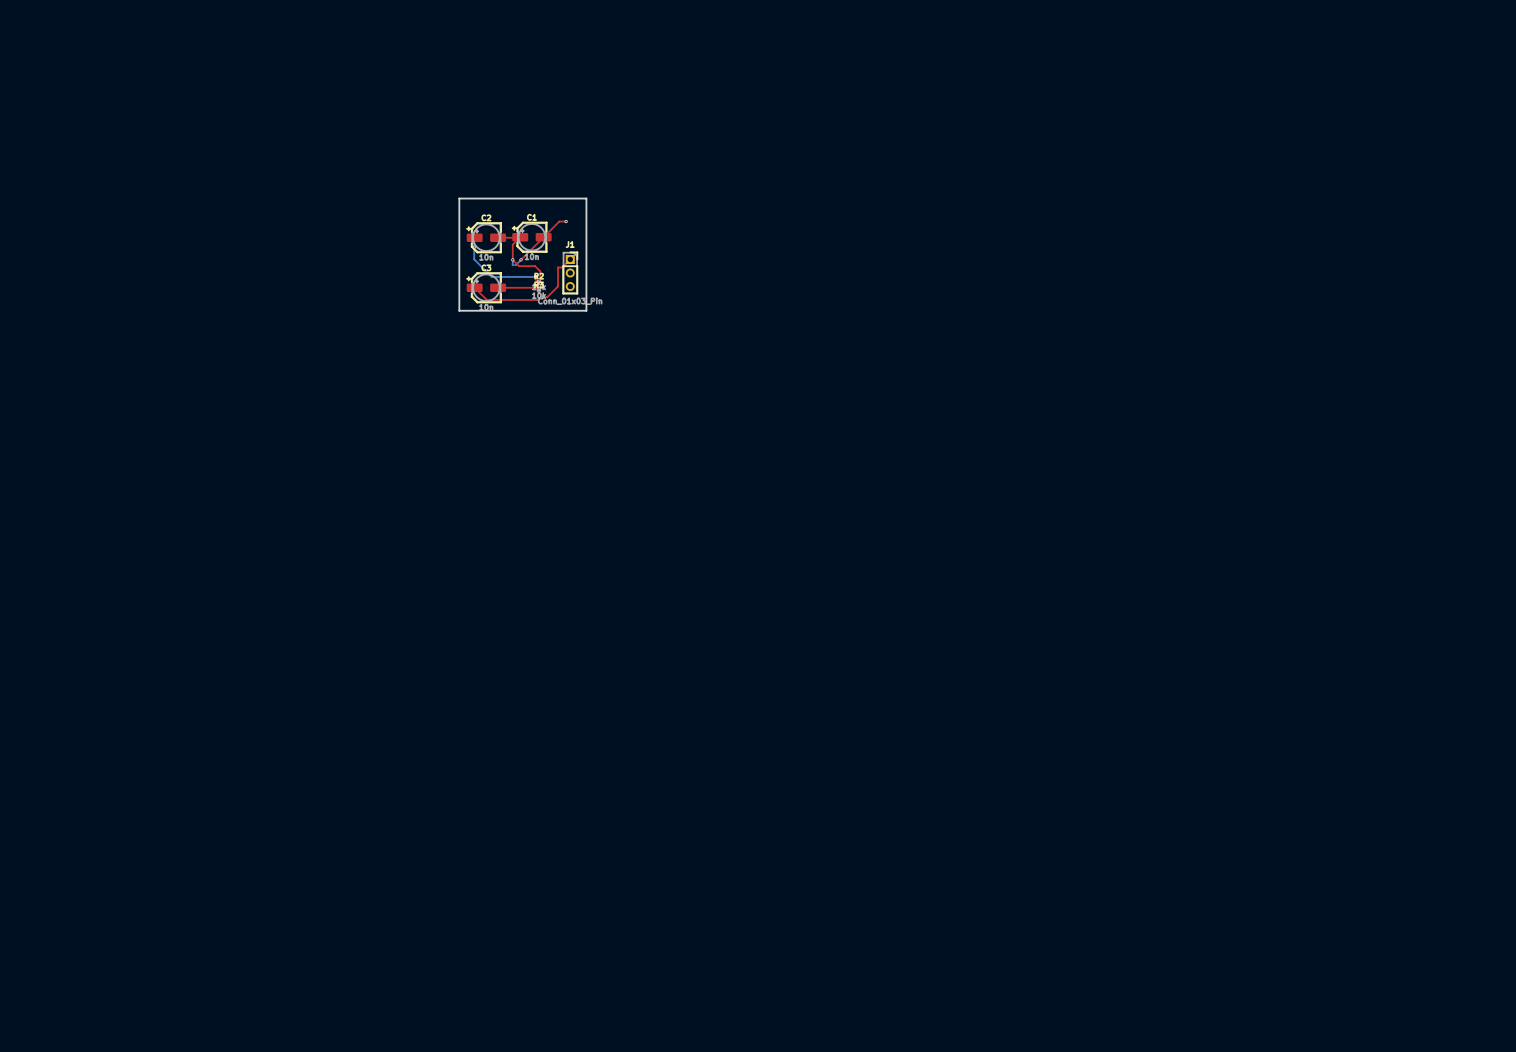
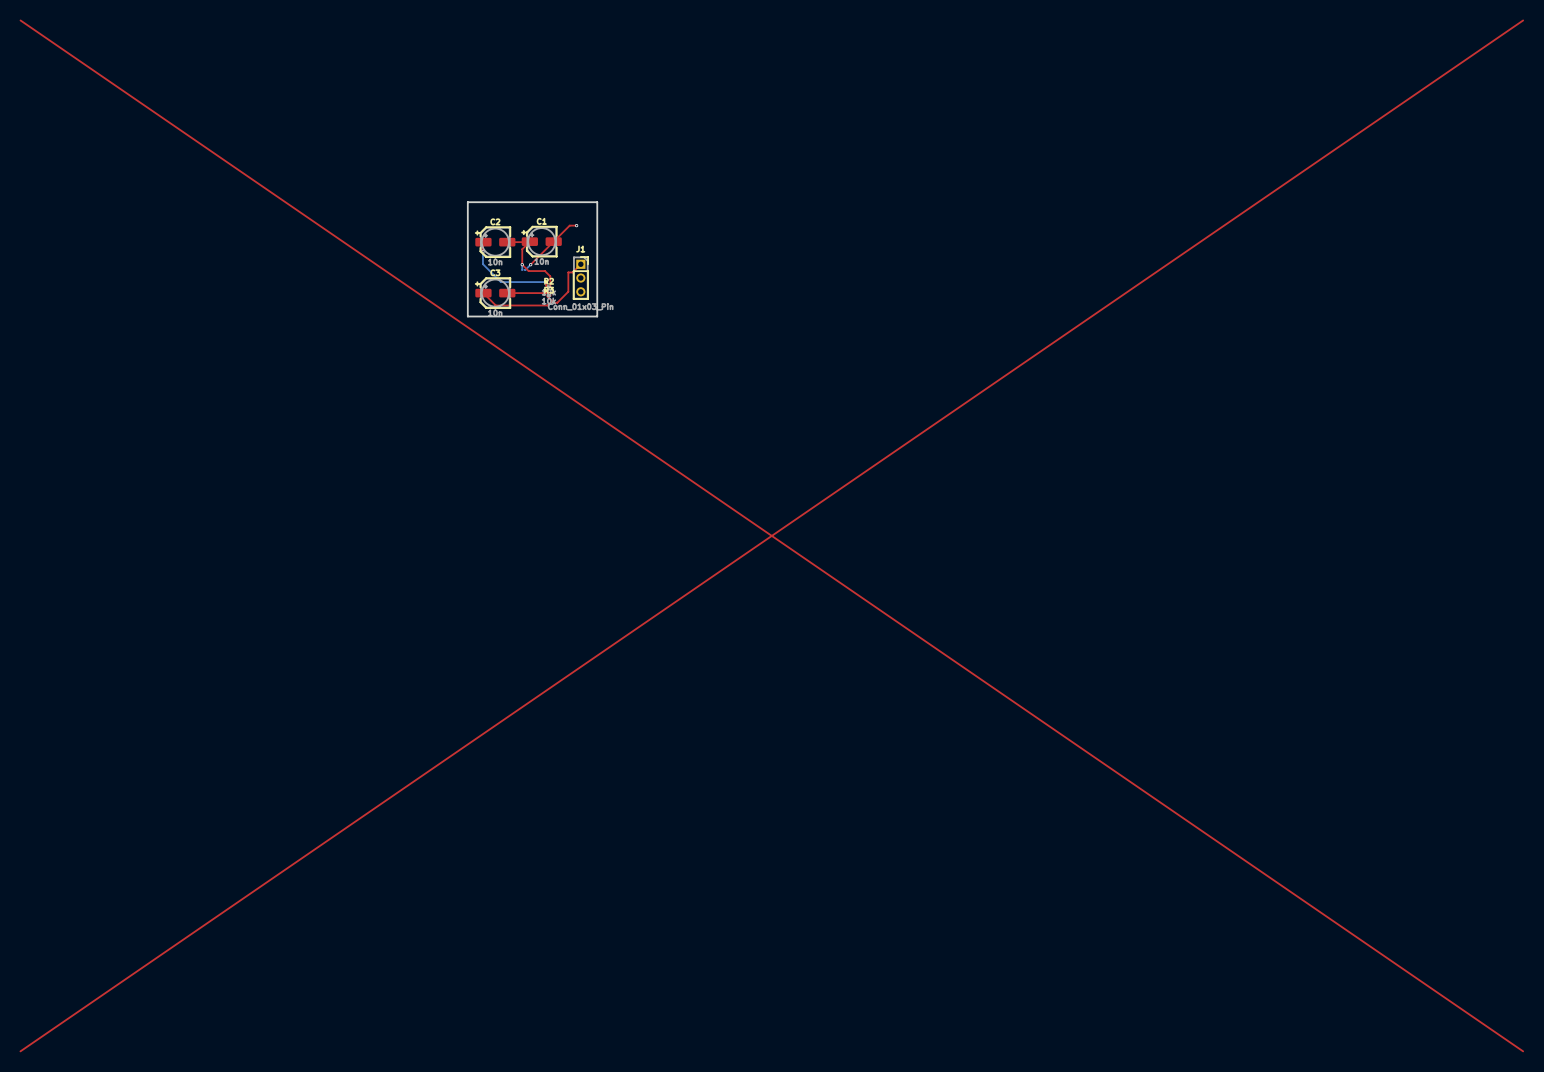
top track: none -> (20, 20) (1523, 1051)
top track: none -> (1523, 20) (20, 1051)

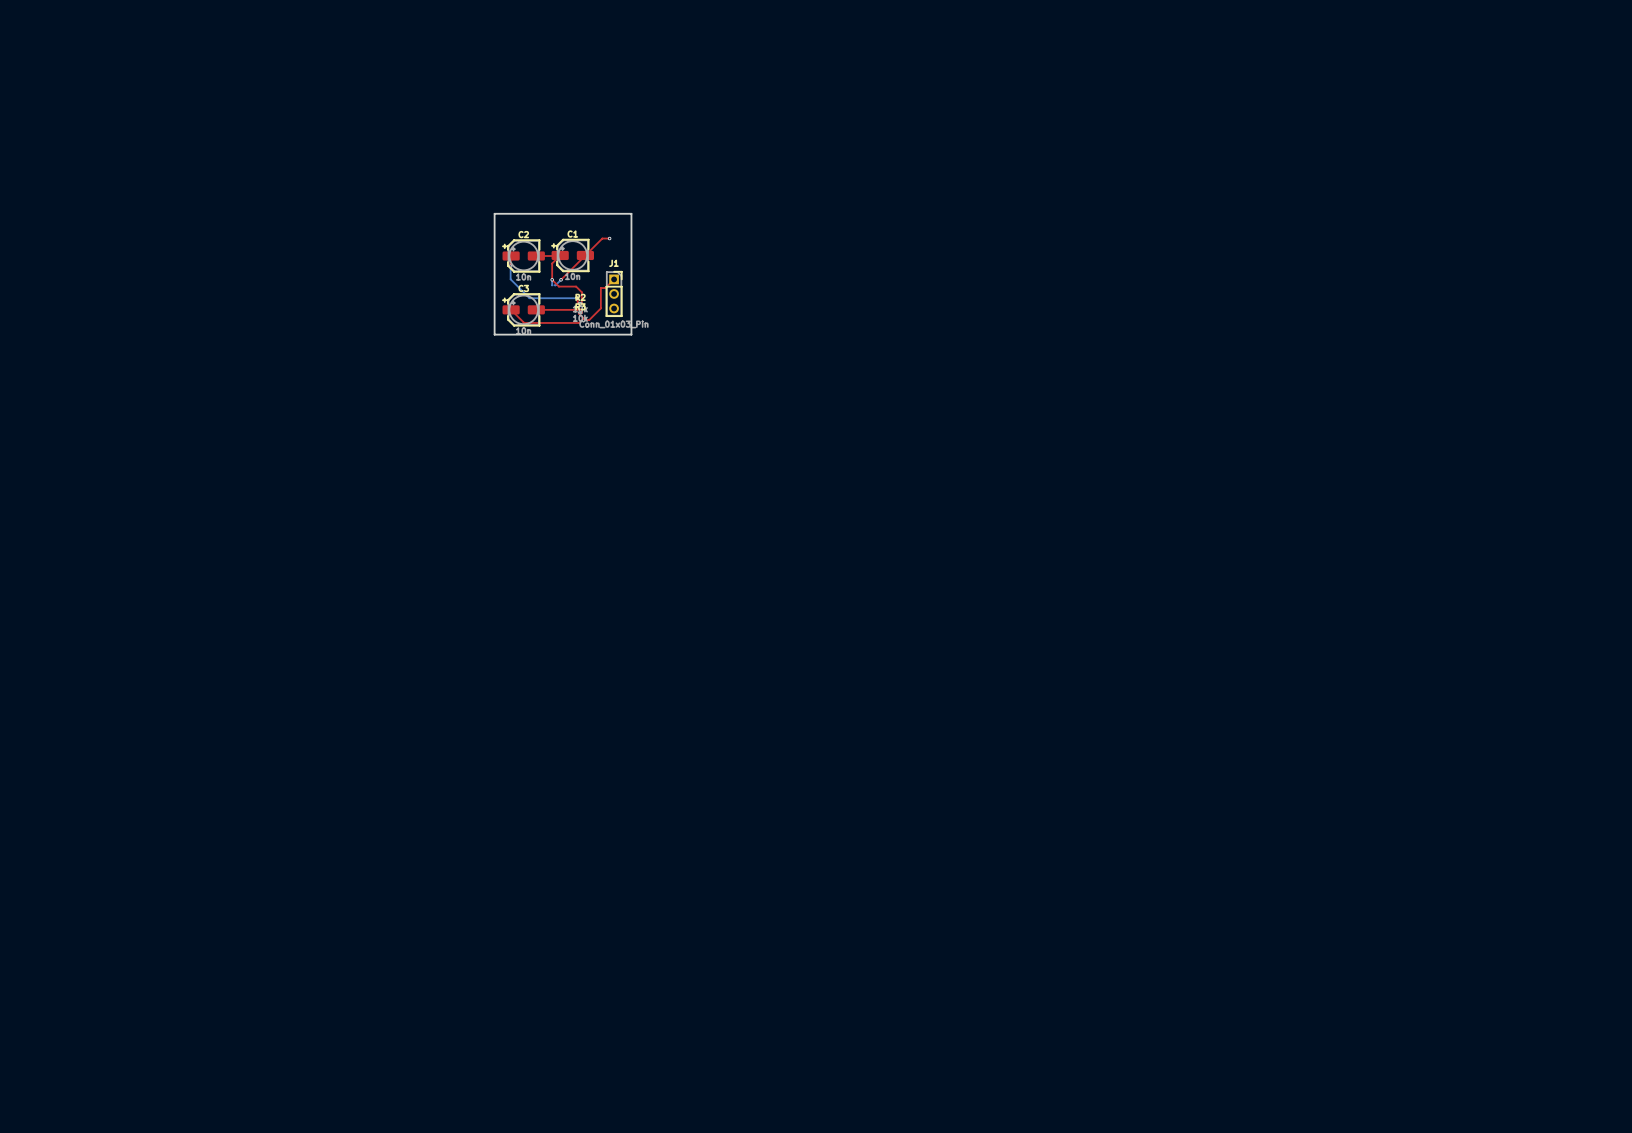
top track: (20, 20) (1523, 1051) -> none
top track: (1523, 20) (20, 1051) -> none

